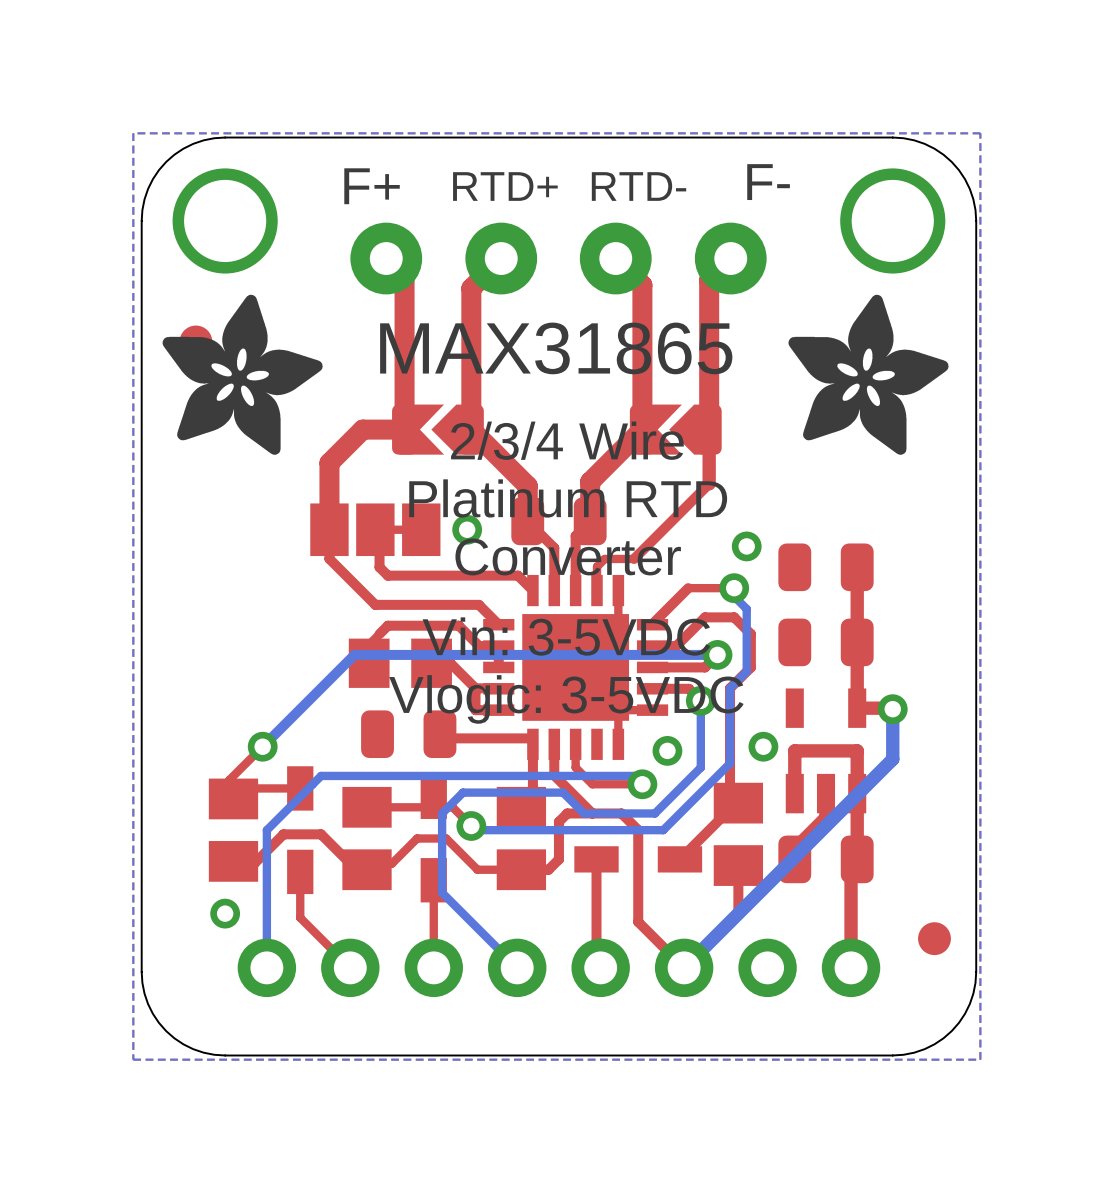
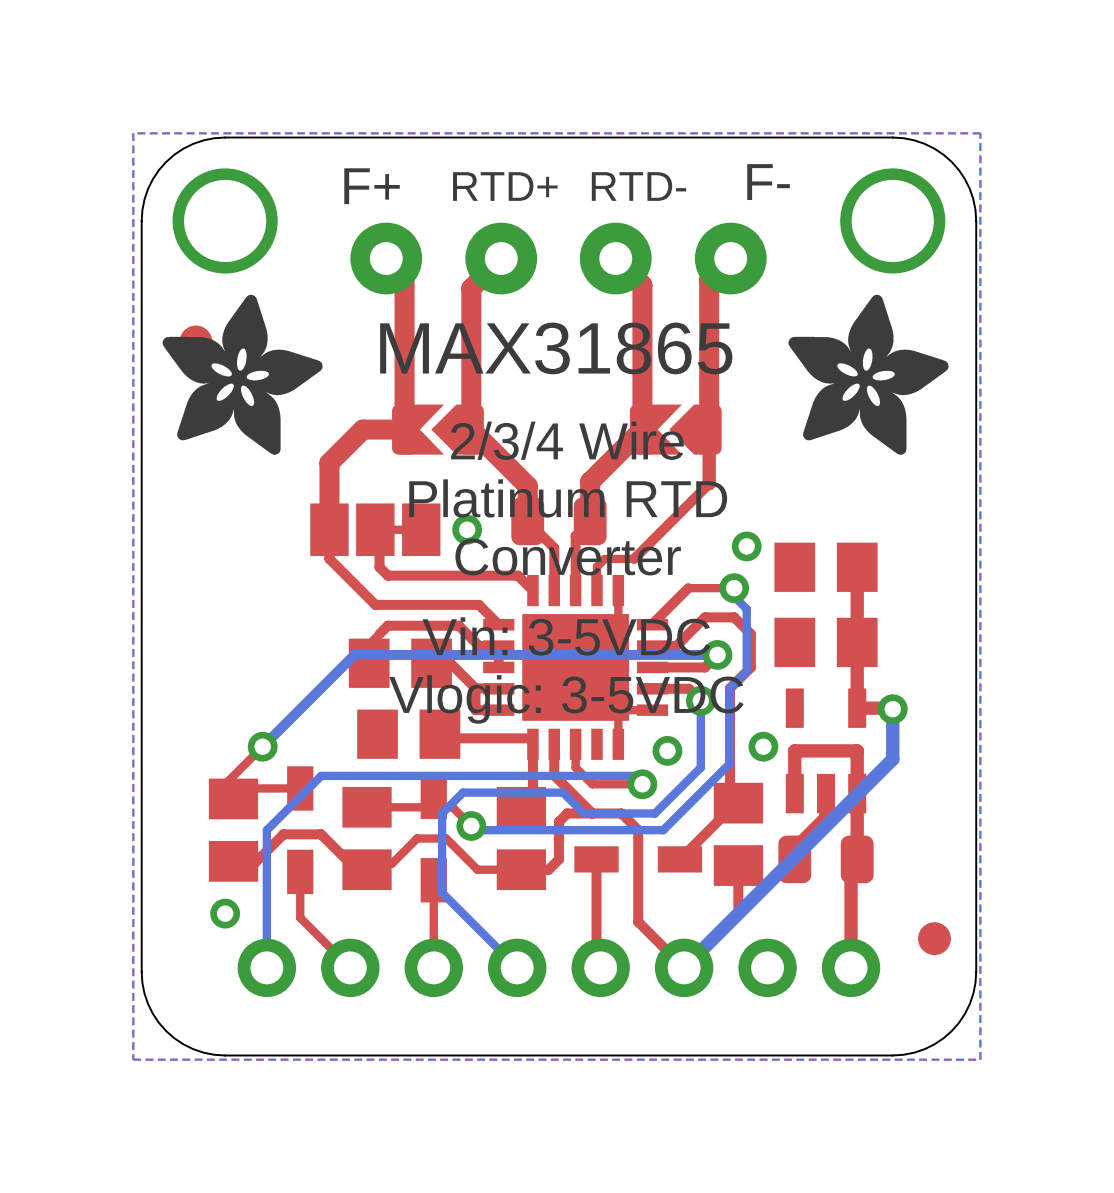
part footprint: [778, 543, 874, 592] -> [774, 542, 878, 592]
part footprint: [778, 618, 874, 667] -> [774, 617, 878, 668]
part footprint: [361, 710, 457, 759] -> [357, 709, 461, 759]

